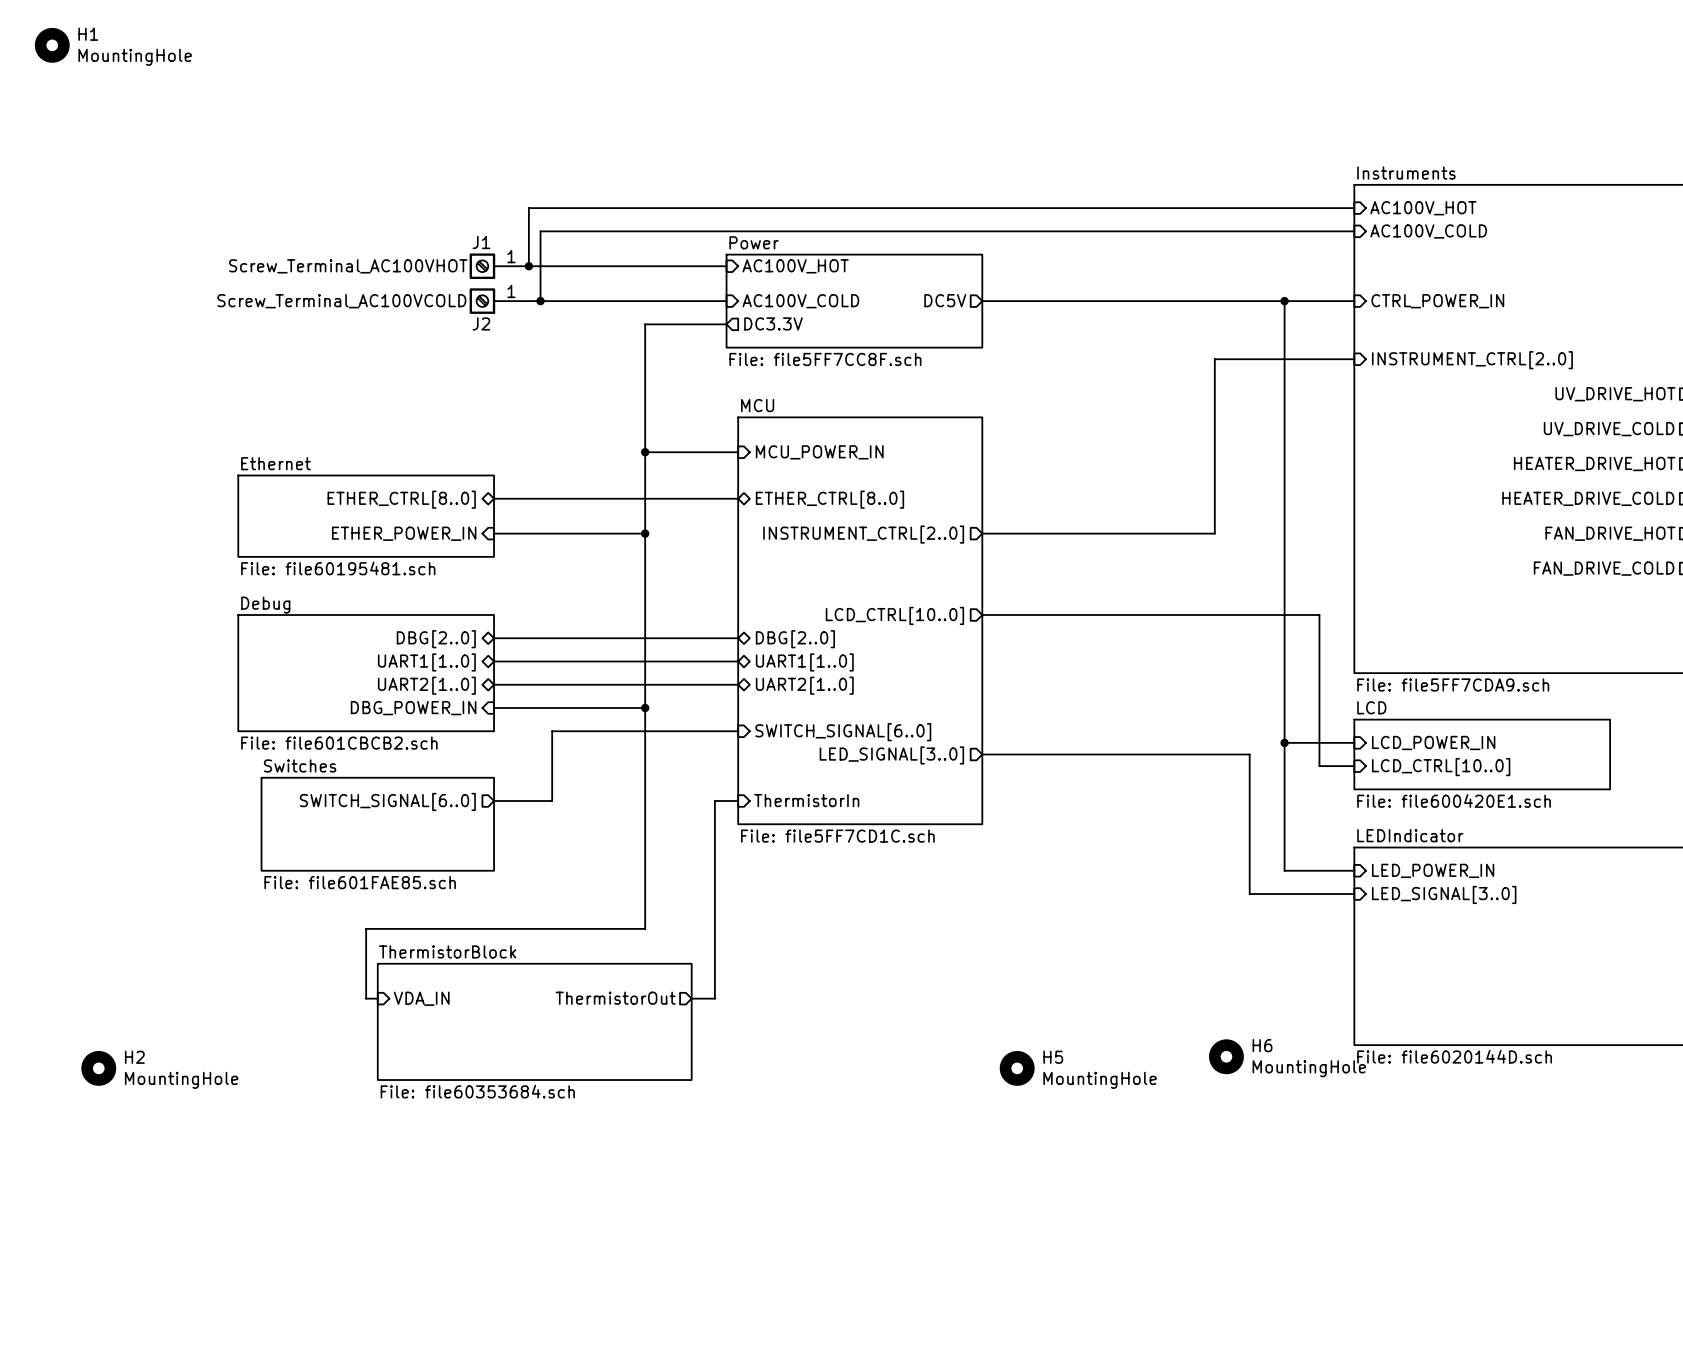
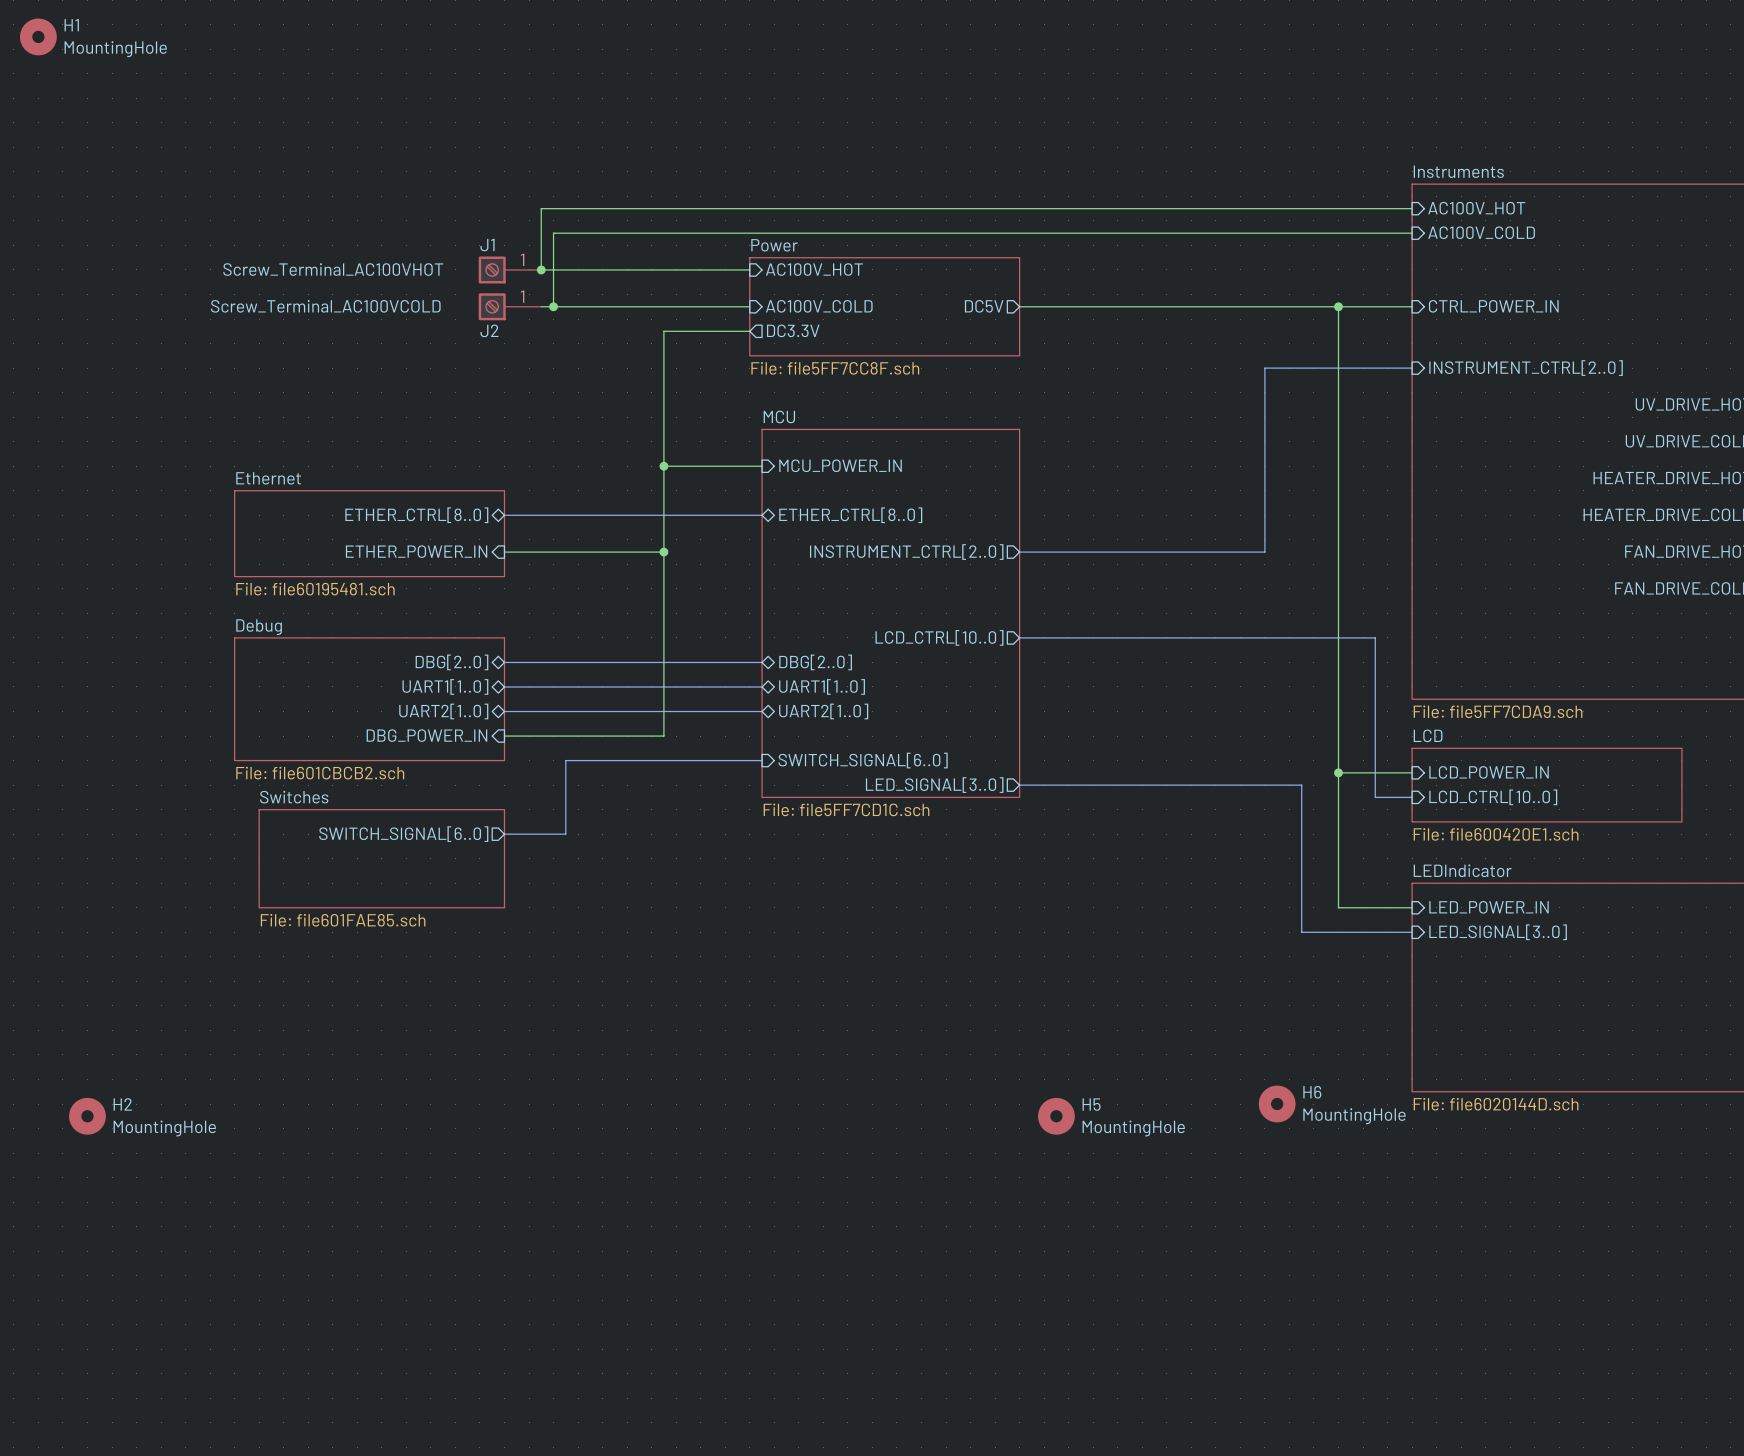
sheet MCU: none -> File: file5FF7CD1C.sch (890, 613)
sheet MCU: File: file5FF7CD1C.sch (860, 620) -> none
wire: (645, 708) (645, 928) (366, 928) (366, 998) (377, 998) -> none
junction: (645, 708) -> none
sheet pin: ThermistorIn (806, 800) -> none
wire: (738, 801) (714, 801) (714, 998) (691, 998) -> none
sheet pin: VDA_IN (421, 998) -> none
sheet pin: ThermistorOut (615, 998) -> none
sheet ThermistorBlock: File: file60353684.sch (534, 1021) -> none

